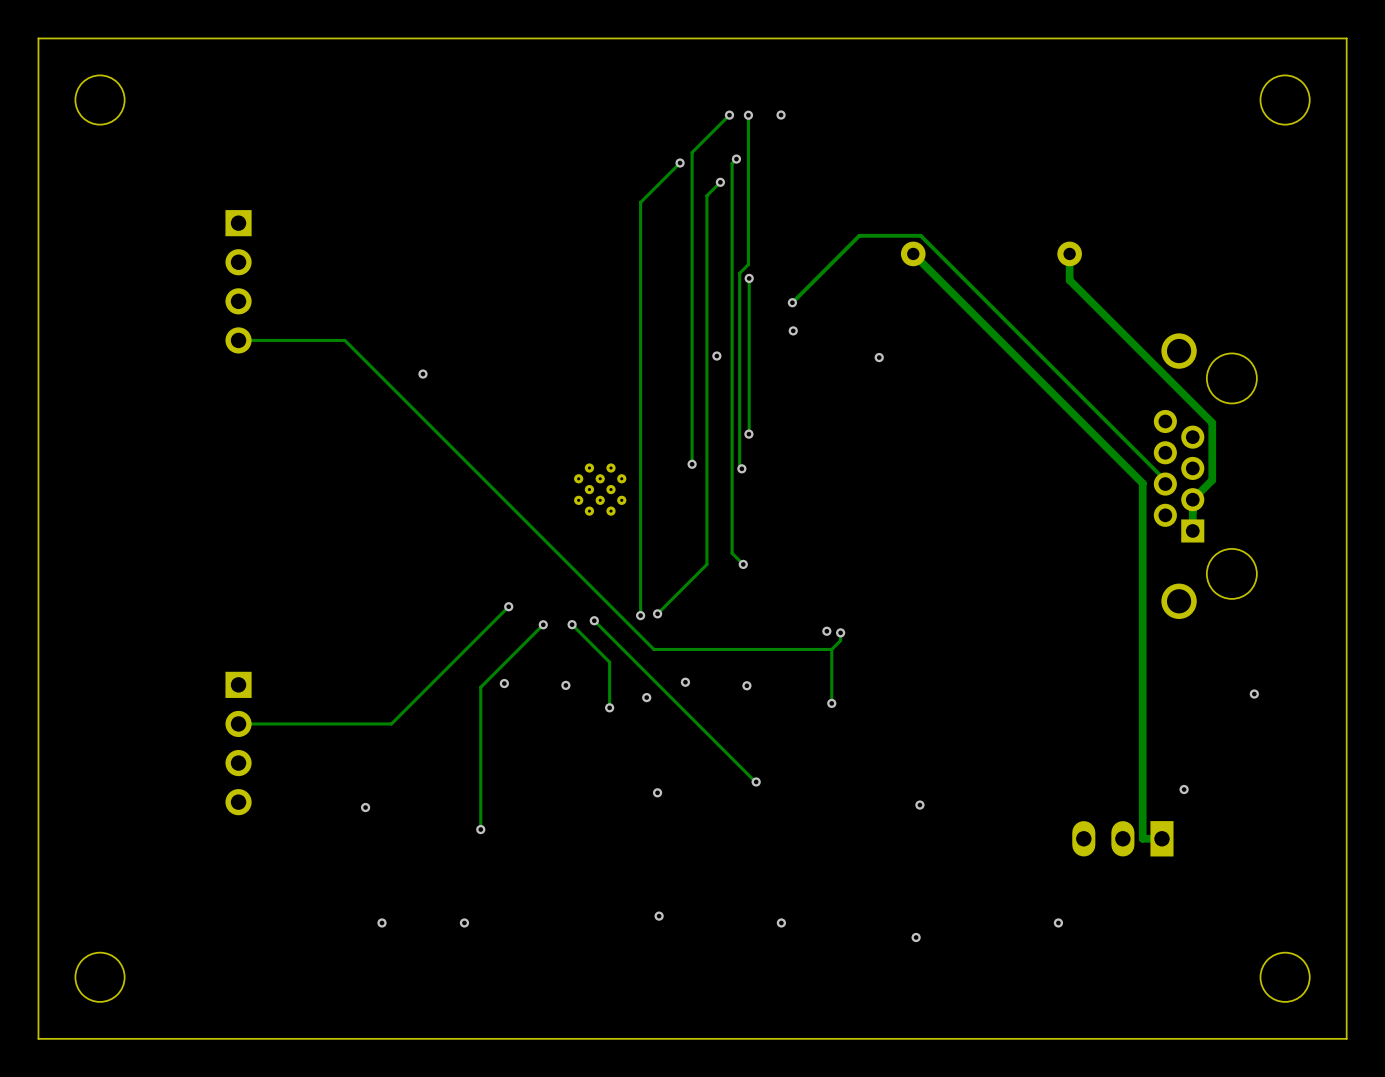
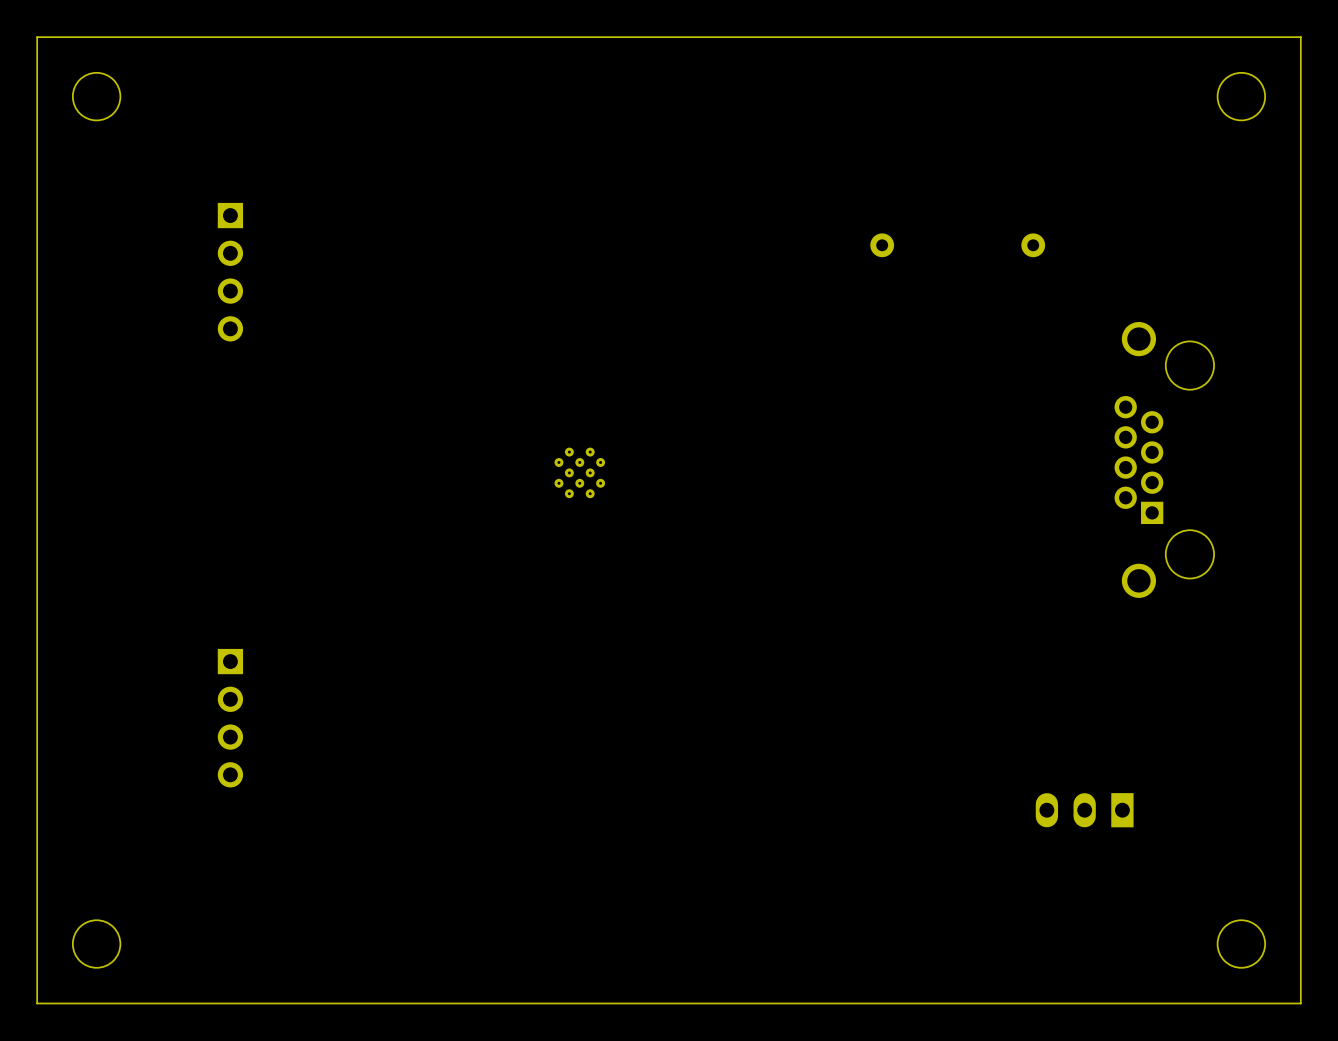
track: (729, 115) (692, 152) (692, 464) -> none
via: (729, 115) -> none
track: (748, 115) (748, 264) (739, 273) (739, 466) (741, 468) -> none
via: (748, 115) -> none
via: (781, 115) -> none
track: (736, 159) (732, 163) (732, 553) (743, 564) -> none
via: (736, 159) -> none
track: (680, 162) (640, 202) (640, 615) -> none
via: (680, 162) -> none
track: (720, 182) (706, 195) (706, 564) (657, 613) -> none
via: (720, 182) -> none
track: (913, 253) (1142, 483) (1142, 838) (1161, 838) -> none
track: (1069, 253) (1069, 280) (1212, 422) (1212, 480) (1192, 499) (1192, 530) -> none
track: (749, 278) (748, 434) -> none
via: (749, 278) -> none
track: (792, 302) (859, 235) (920, 235) (1165, 480) (1165, 484) -> none
via: (792, 302) -> none
via: (793, 330) -> none
track: (238, 340) (344, 340) (653, 649) (831, 649) -> none
via: (716, 356) -> none
via: (879, 357) -> none
via: (422, 374) -> none
via: (748, 434) -> none
via: (692, 464) -> none
via: (741, 468) -> none
via: (743, 564) -> none
track: (508, 606) (391, 723) (238, 723) -> none
via: (508, 606) -> none
via: (657, 613) -> none
via: (640, 615) -> none
track: (594, 620) (756, 781) -> none
via: (594, 620) -> none
track: (543, 624) (480, 687) (480, 829) -> none
via: (543, 624) -> none
track: (572, 624) (609, 662) (609, 707) -> none
via: (572, 624) -> none
via: (826, 631) -> none
track: (840, 632) (840, 640) (831, 649) -> none
via: (840, 632) -> none
track: (831, 649) (831, 703) -> none
via: (685, 682) -> none
via: (504, 683) -> none
via: (565, 685) -> none
via: (746, 685) -> none
via: (1254, 694) -> none
via: (646, 697) -> none
via: (831, 703) -> none
via: (609, 707) -> none
via: (756, 781) -> none
via: (1184, 789) -> none
via: (657, 792) -> none
via: (919, 805) -> none
via: (365, 807) -> none
via: (480, 829) -> none
via: (659, 916) -> none
via: (382, 922) -> none
via: (464, 922) -> none
via: (781, 922) -> none
via: (1058, 922) -> none
via: (916, 937) -> none

